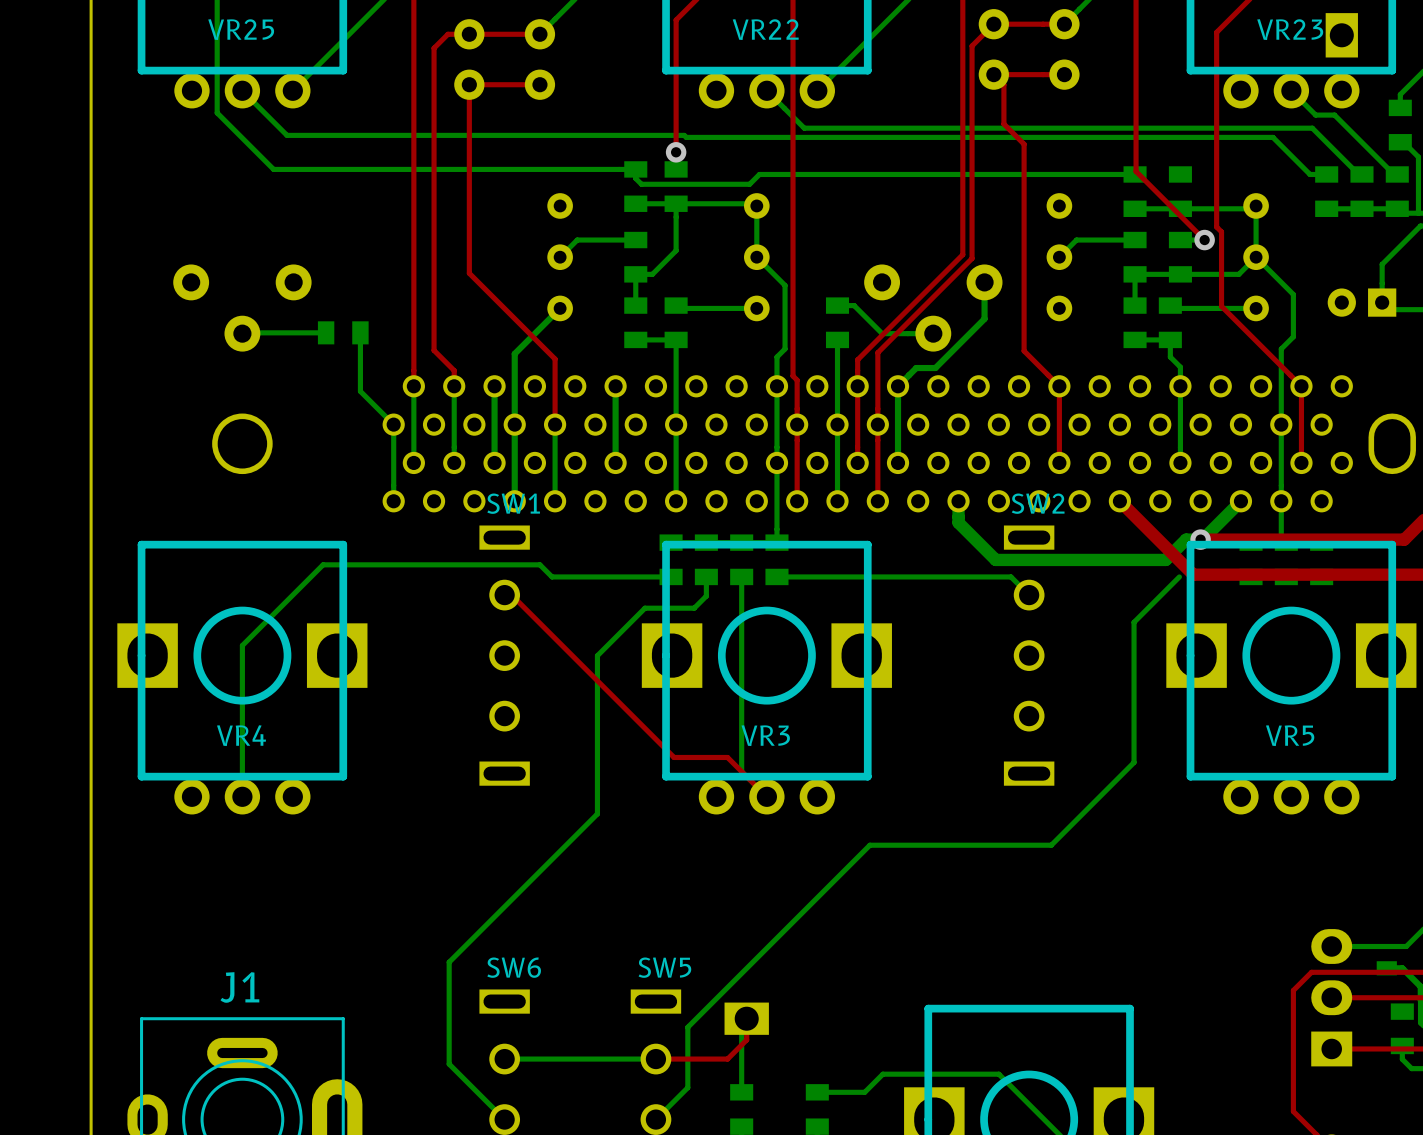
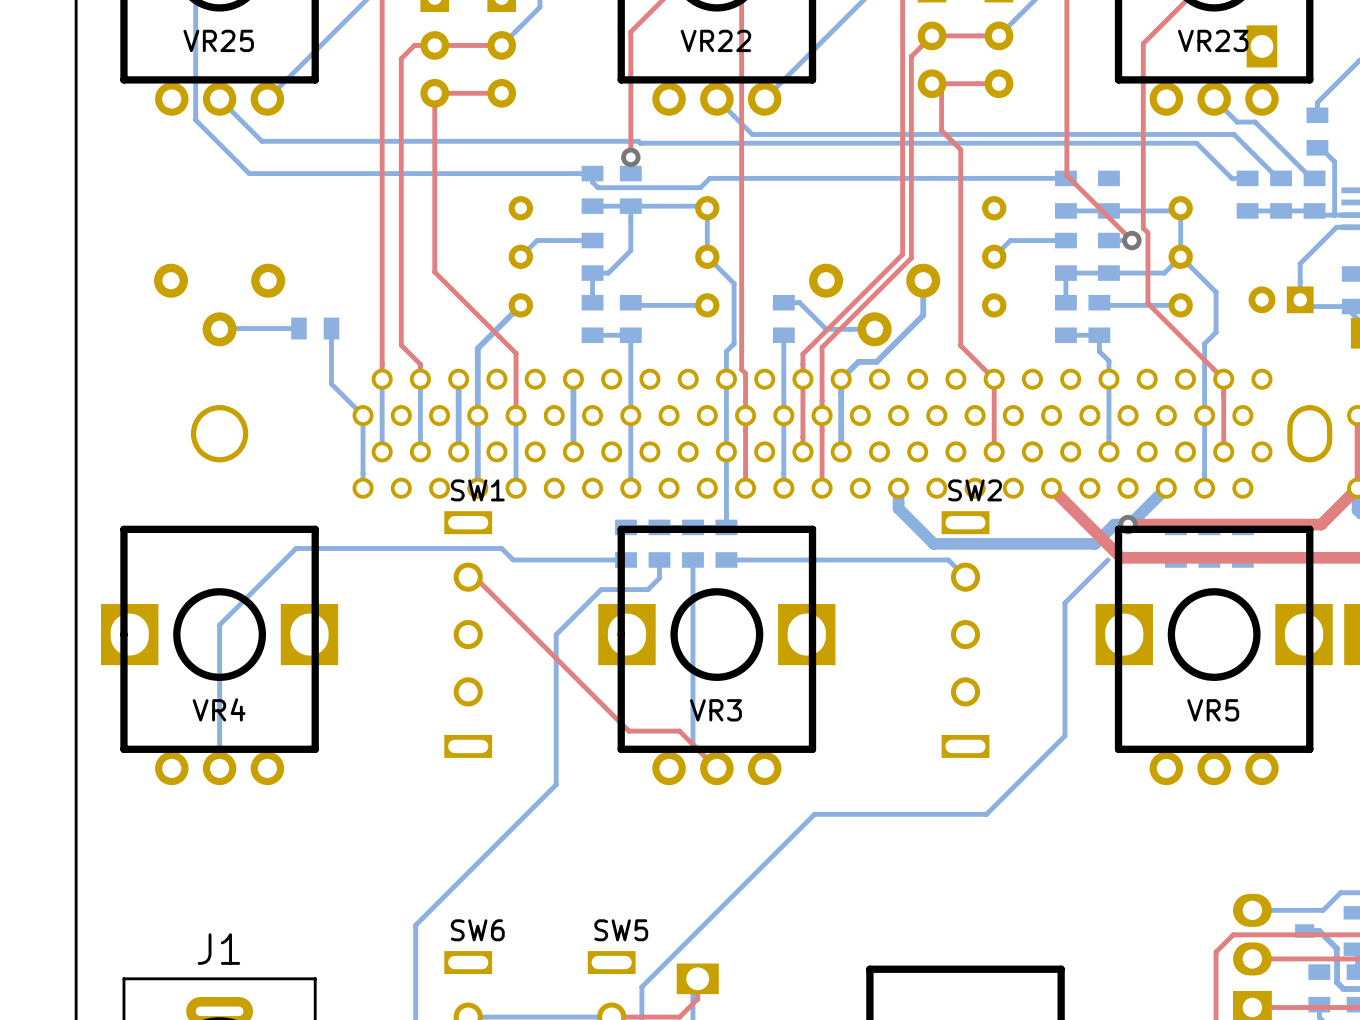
bottom track: (1281, 501) (1281, 537) (1286, 542) -> none

